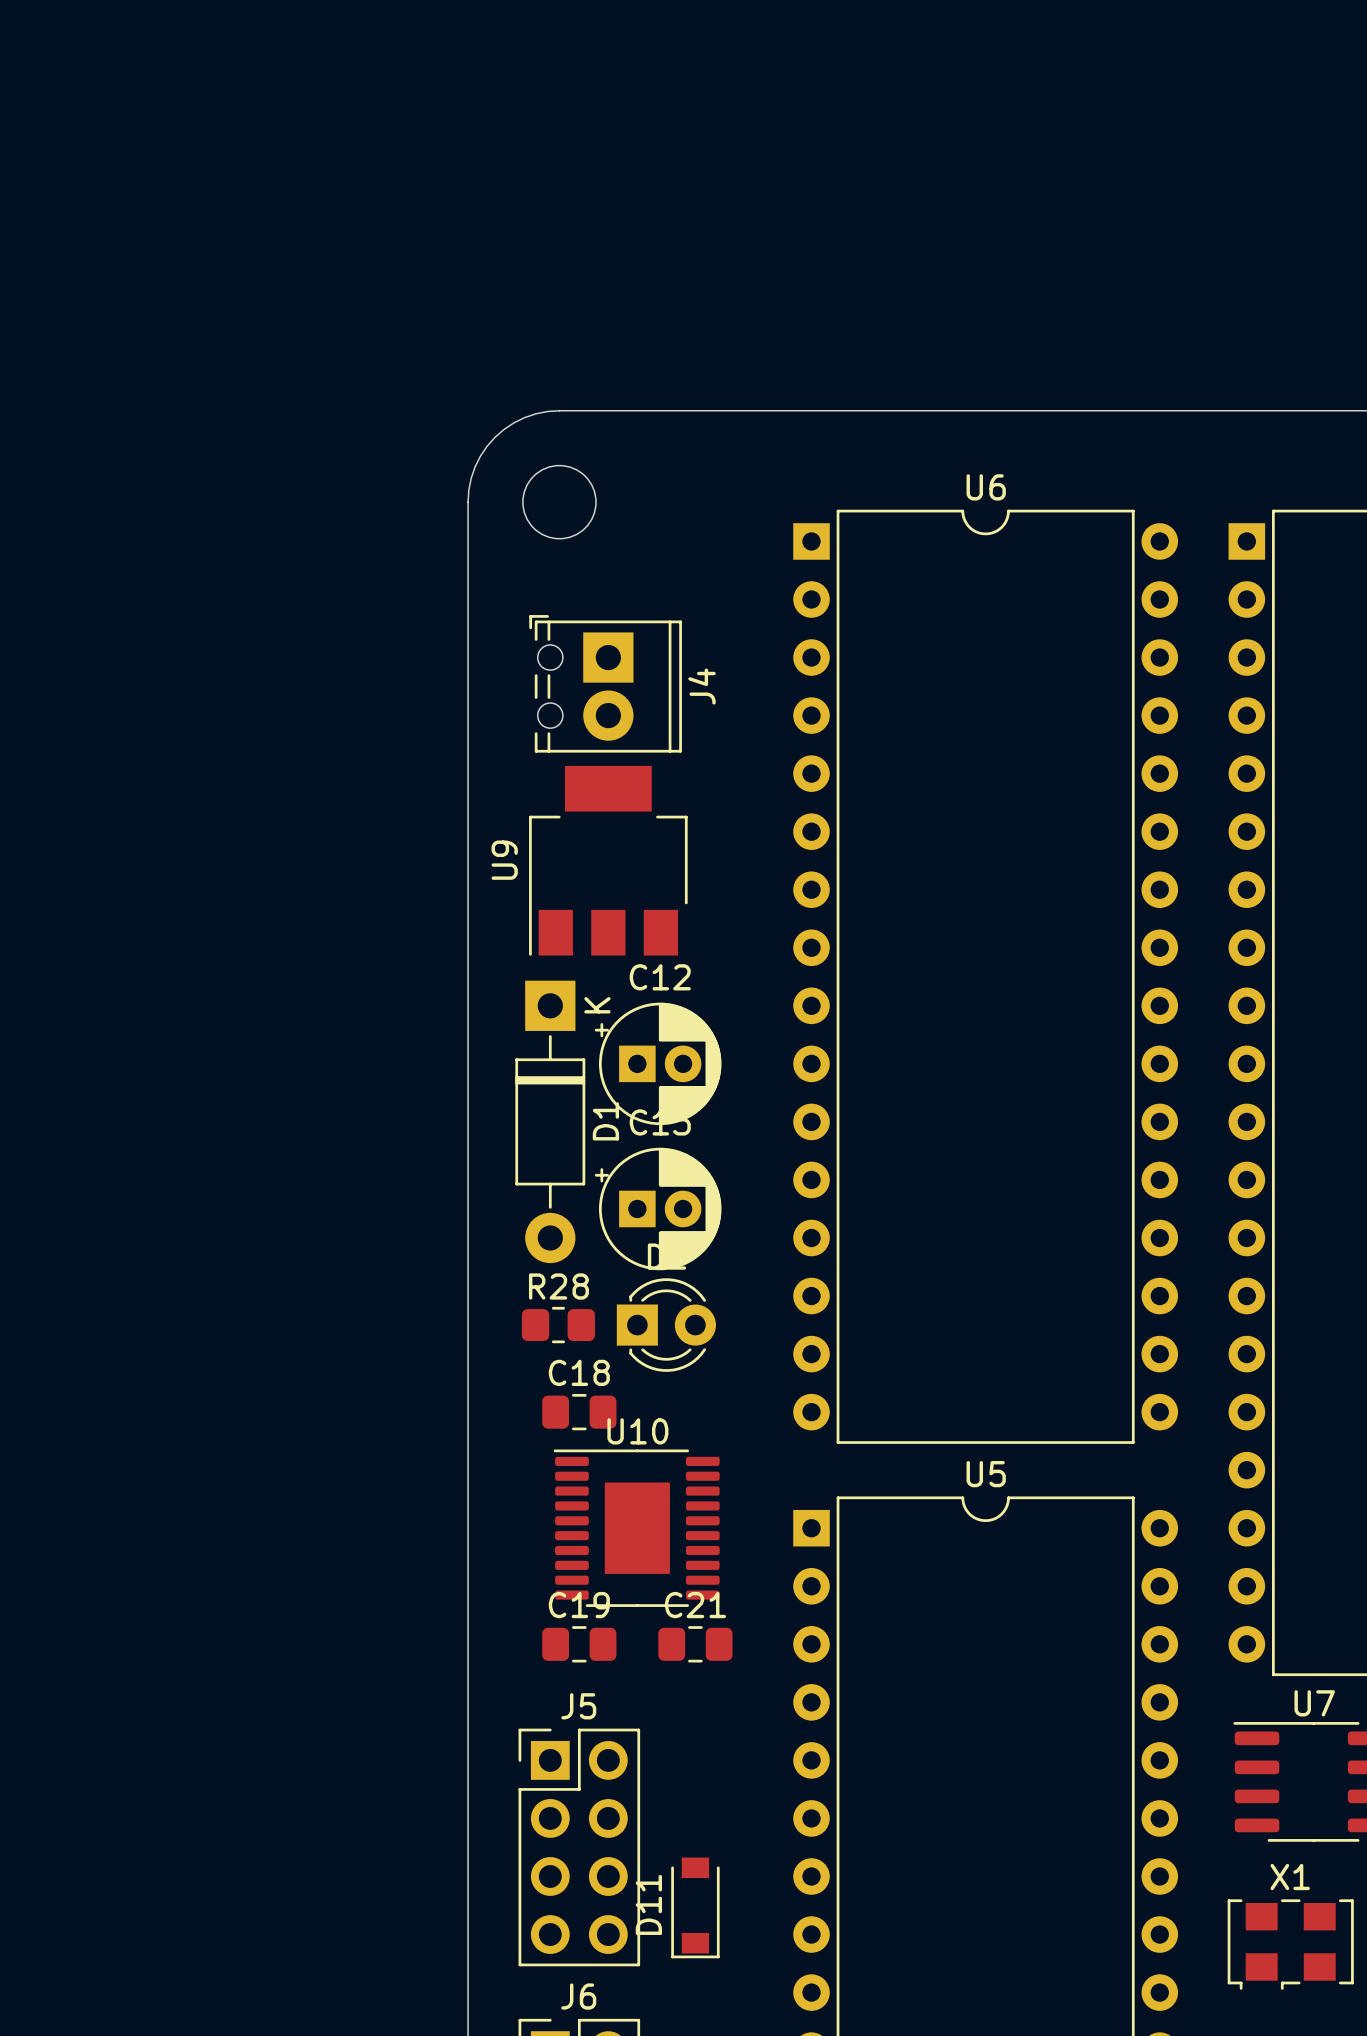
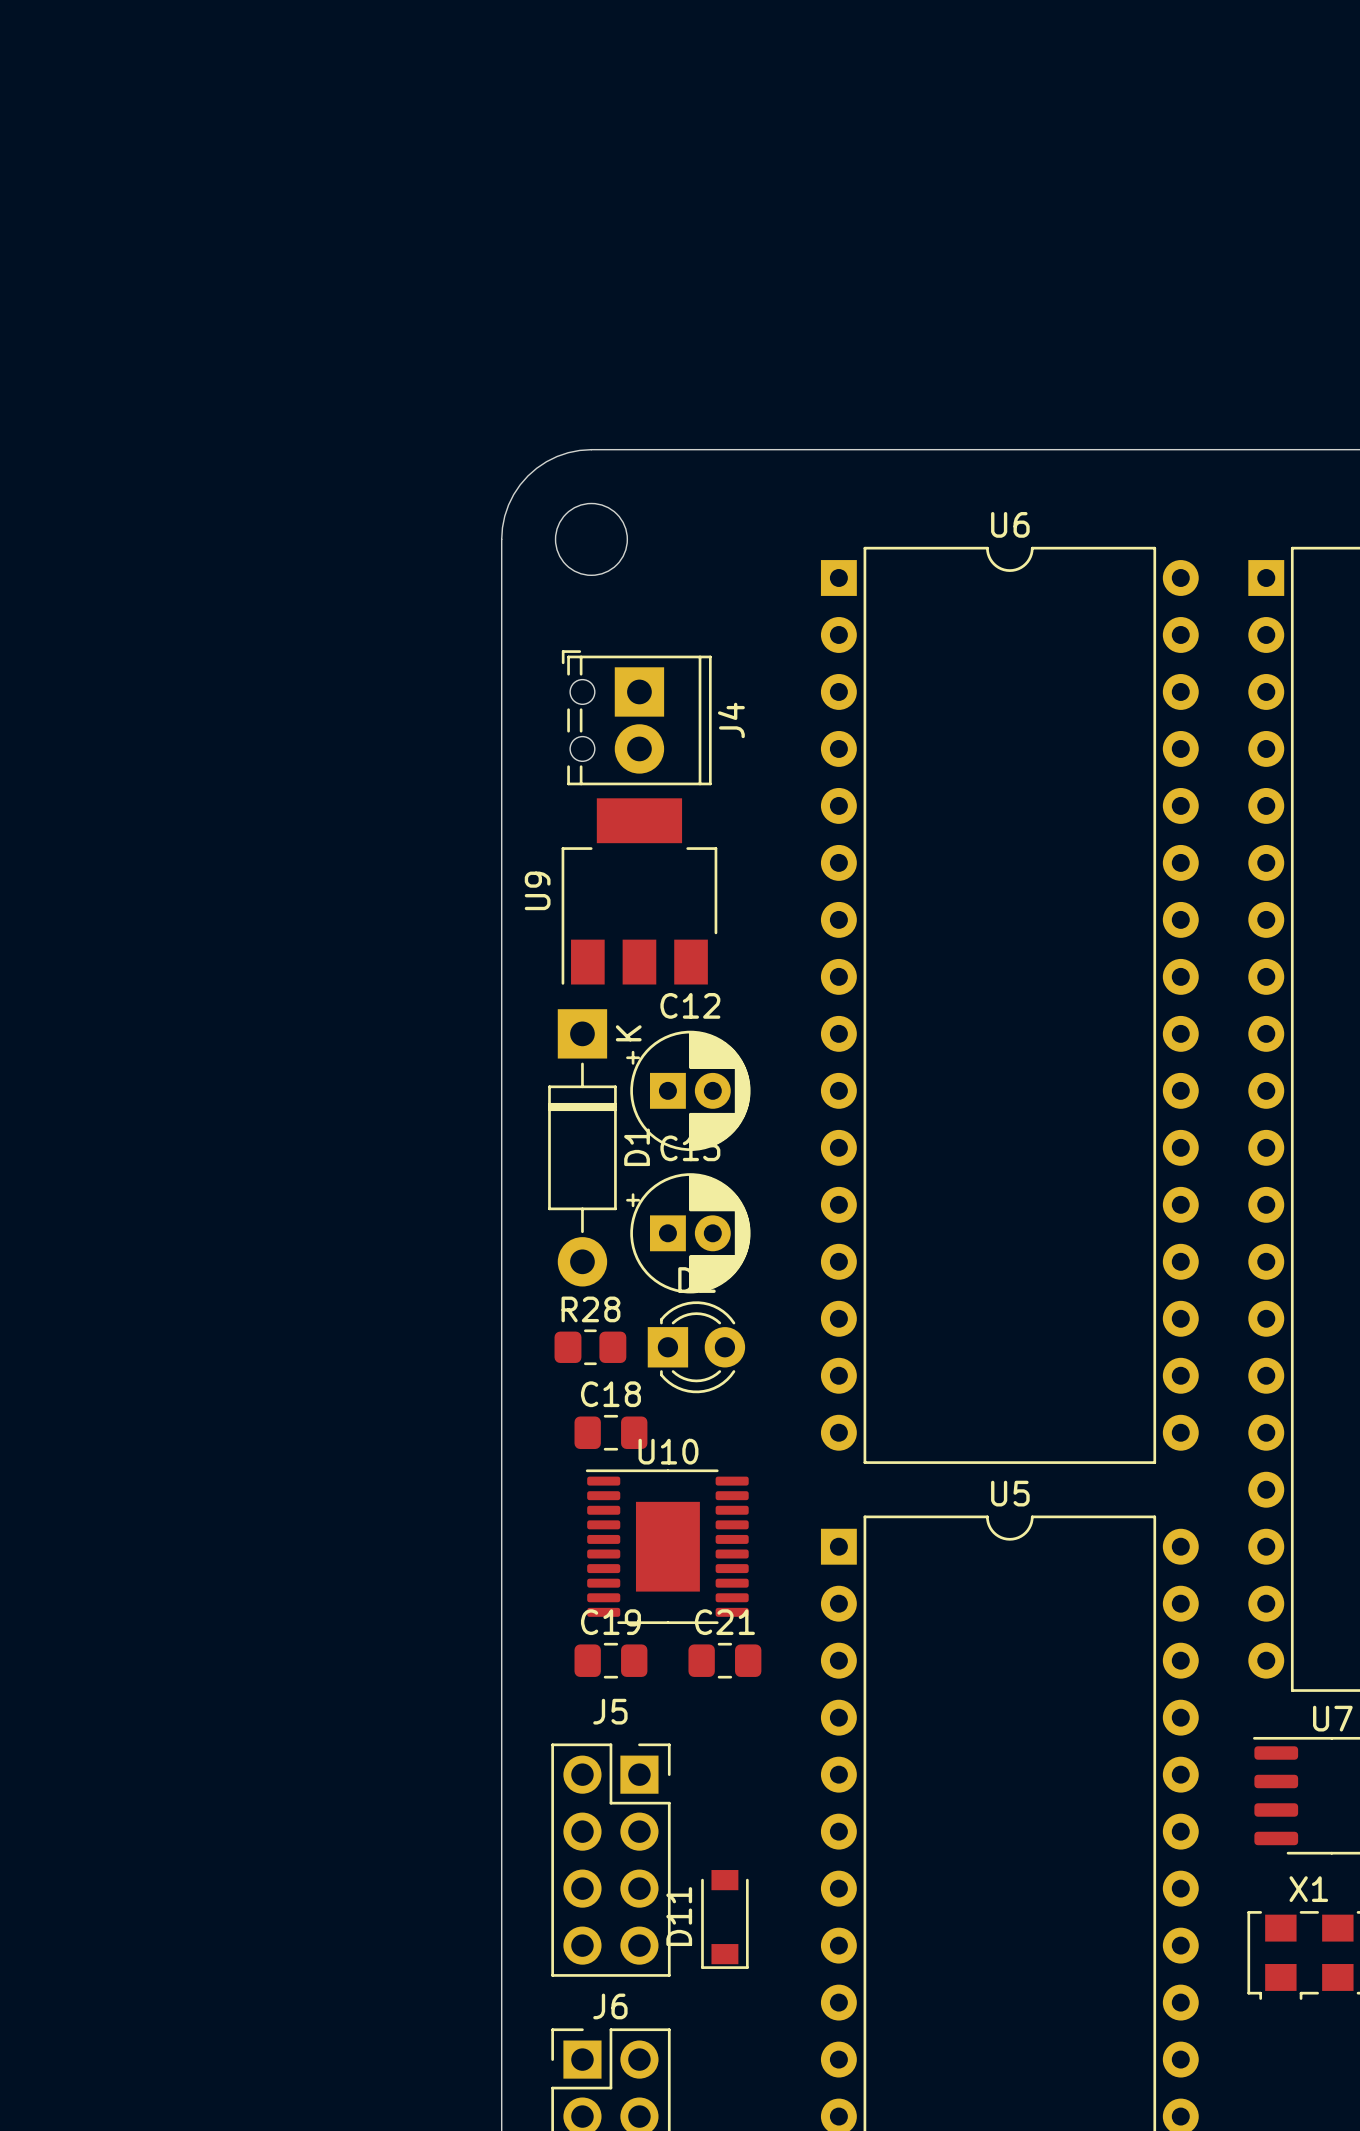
J5 footprint: [518, 1728, 641, 1967] -> [551, 1743, 671, 1977]

